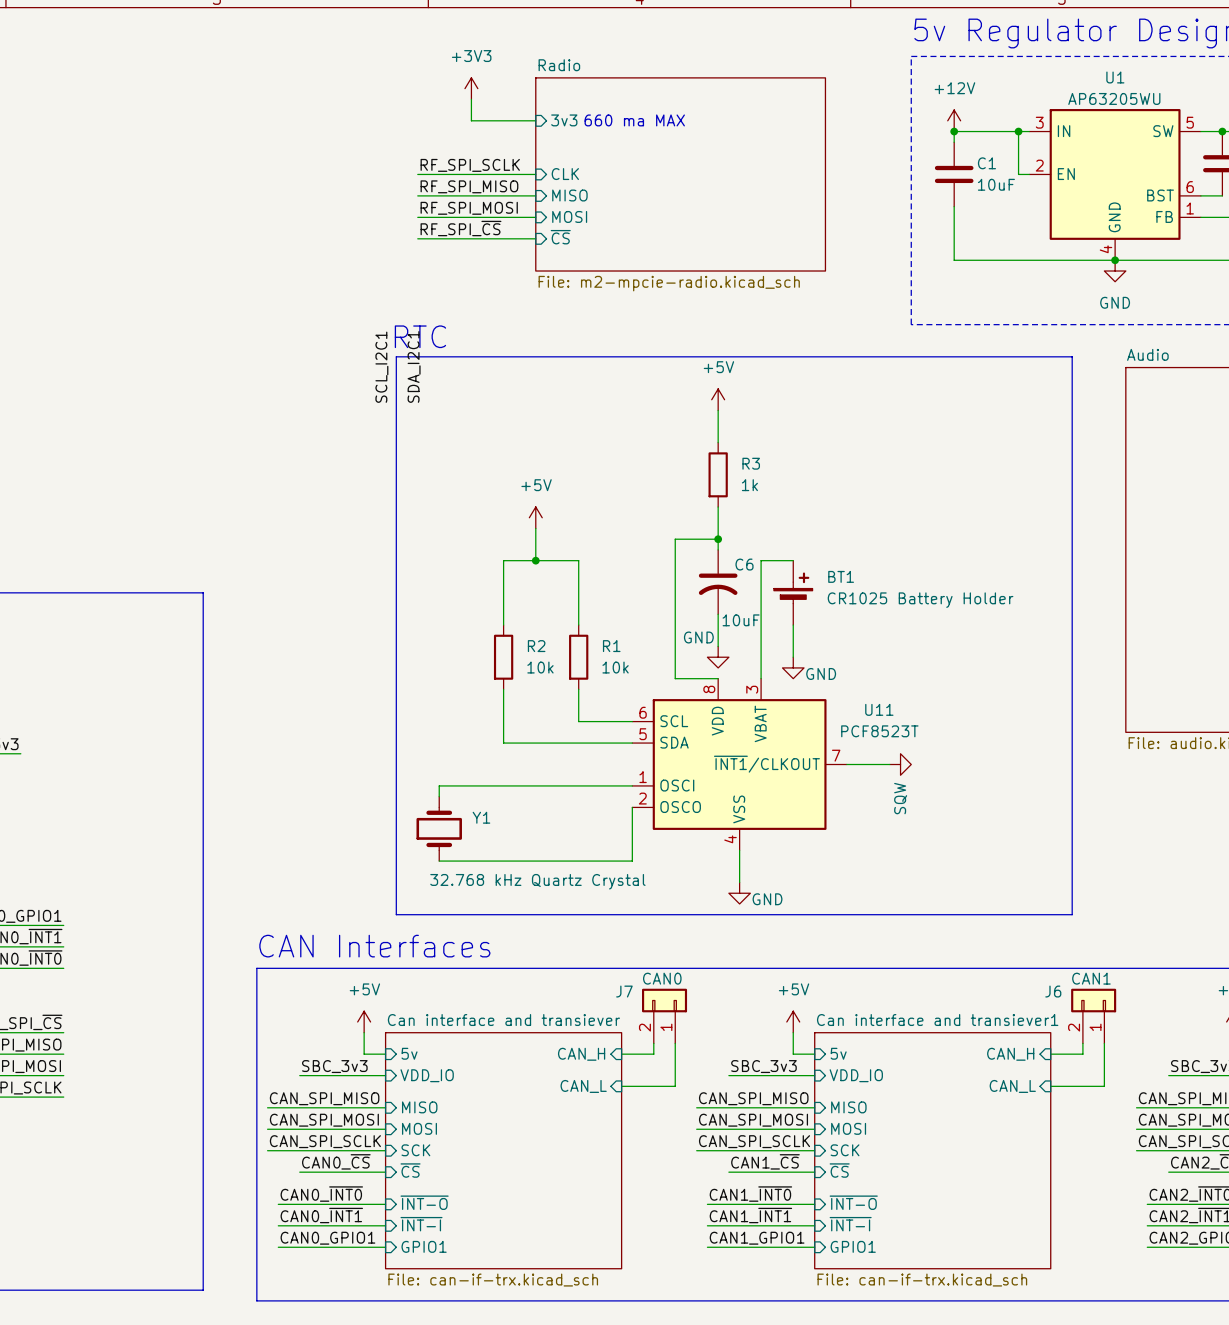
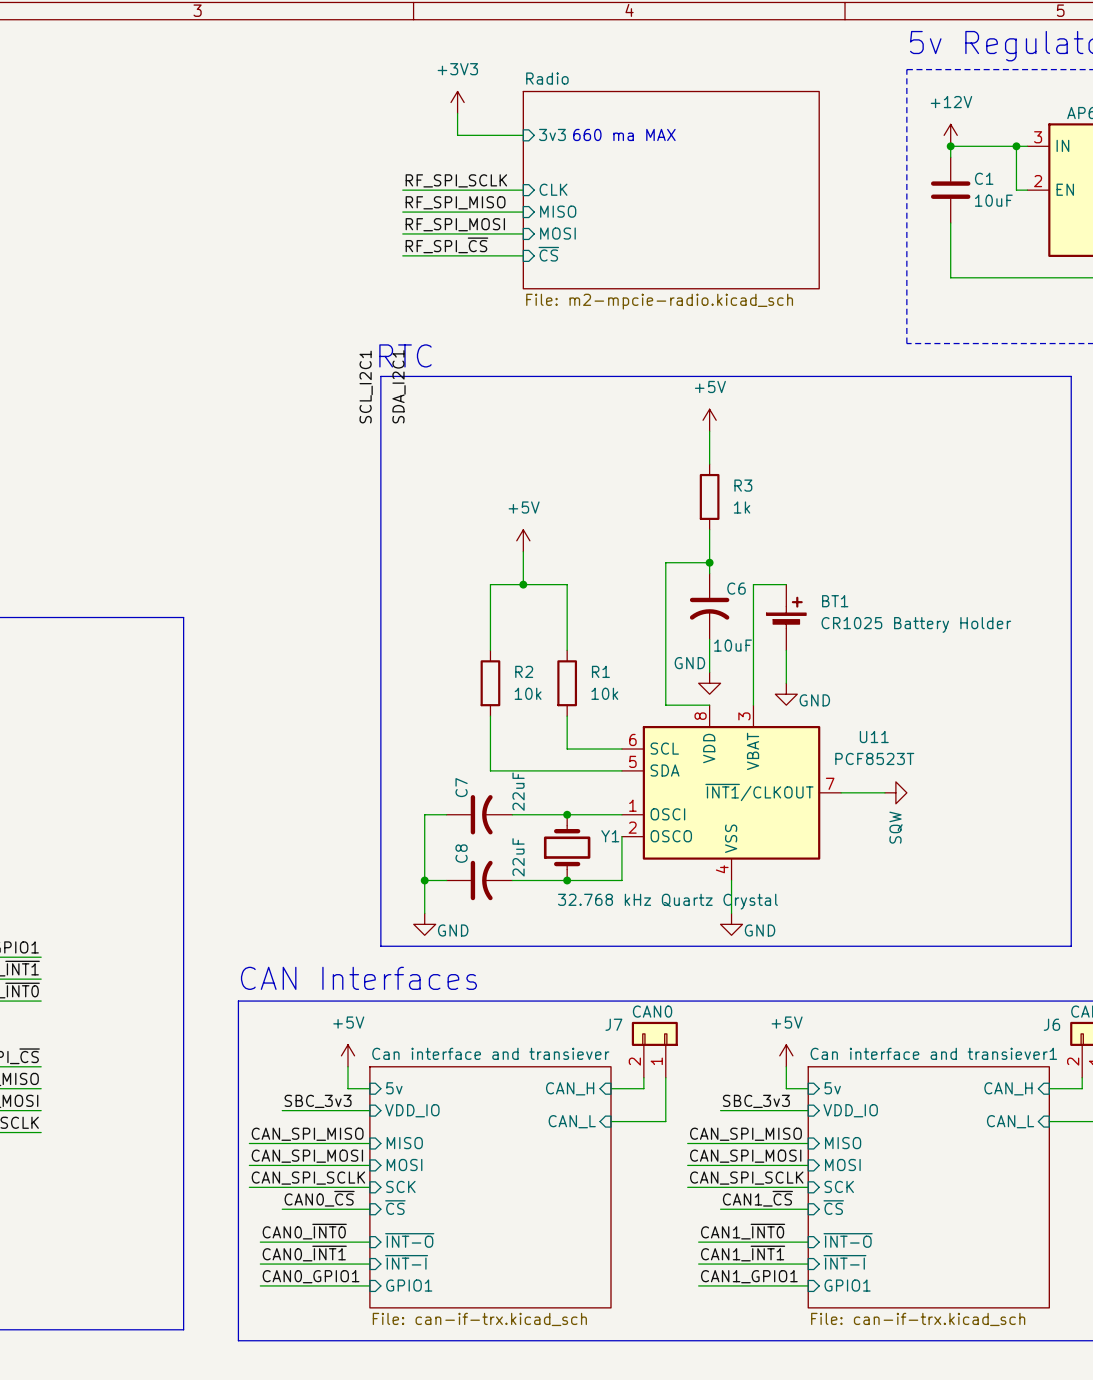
C7: none -> 22uF (479, 814)
junction: none -> (567, 814)
wire: none -> (424, 825) (424, 913)
Y1 position: (439, 828) -> (567, 847)
wire: none -> (424, 880) (446, 880)
junction: none -> (424, 880)
C8: none -> 22uF (479, 880)
junction: none -> (567, 880)
wire: (632, 850) (632, 861) (439, 861) -> (621, 880) (512, 880)
power symbol: none -> GND (424, 924)

